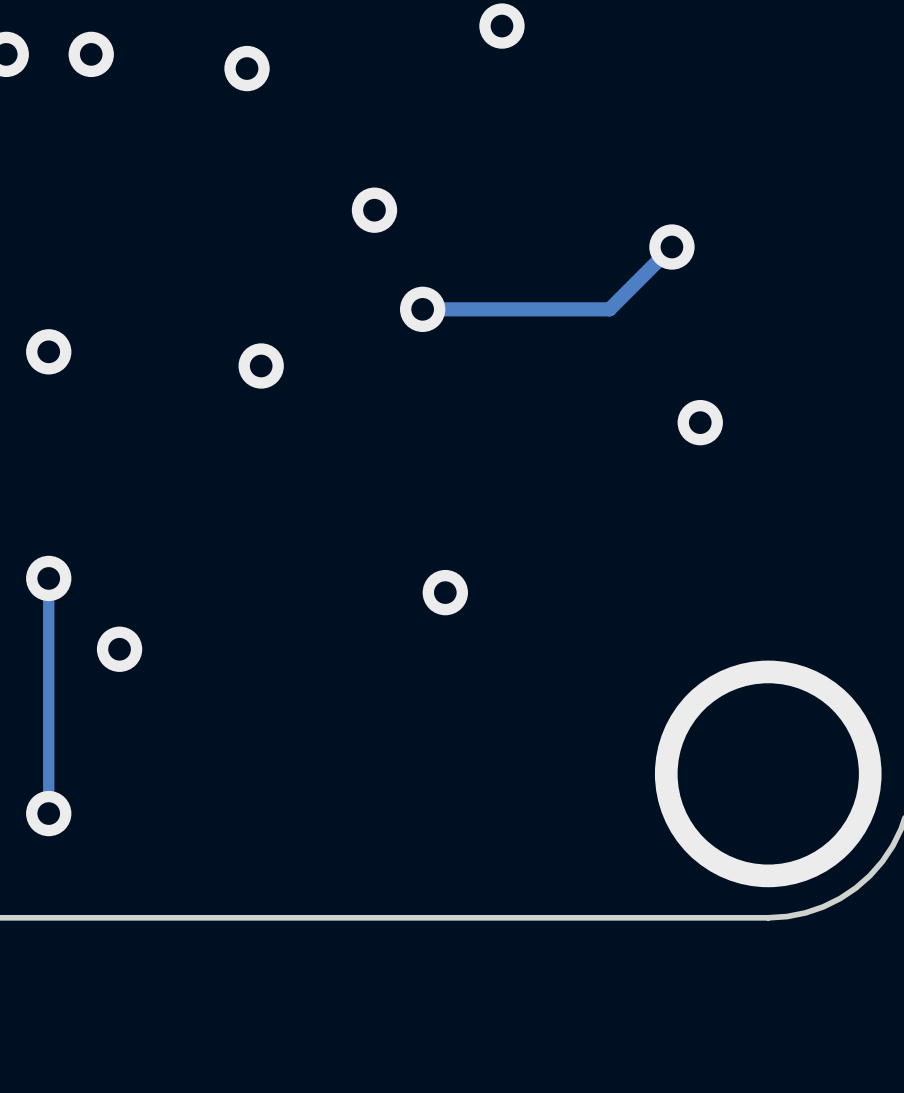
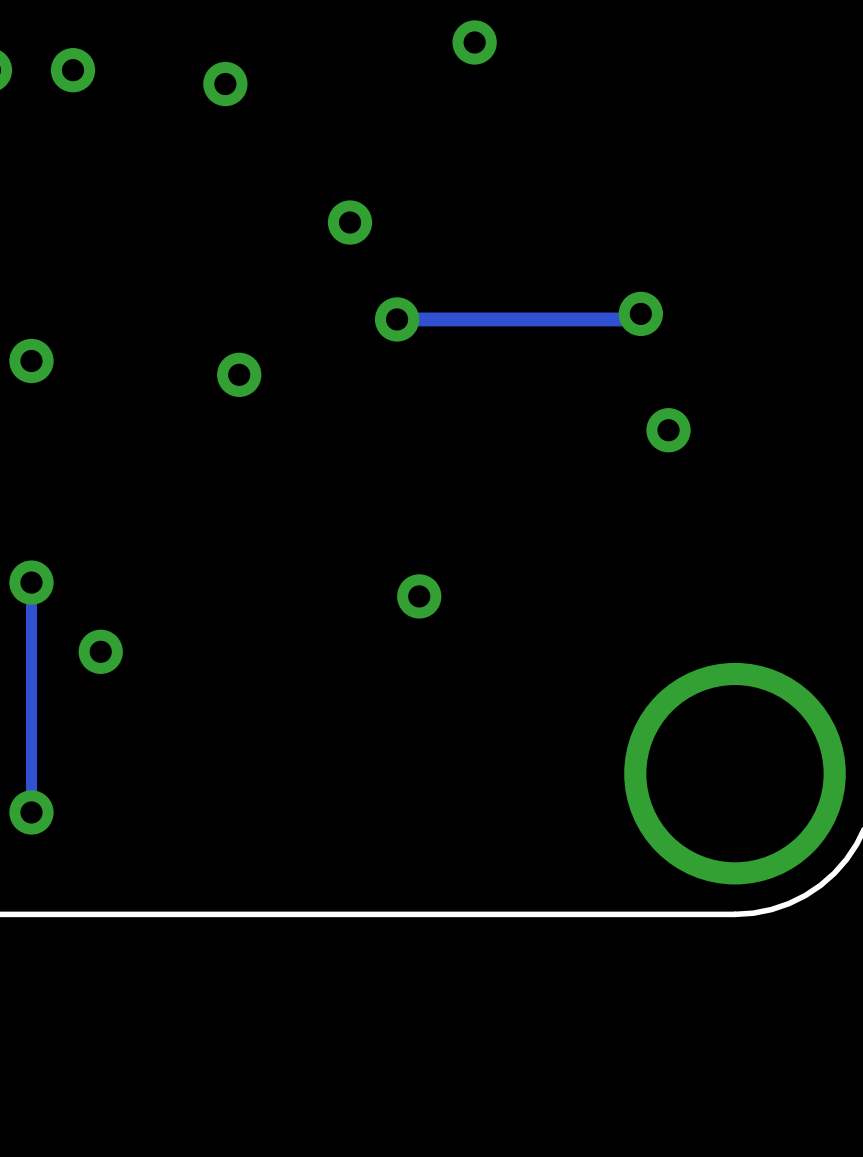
track: (671, 247) (609, 309) -> (640, 313) (635, 319) (579, 319)
via position: (671, 247) -> (640, 313)

